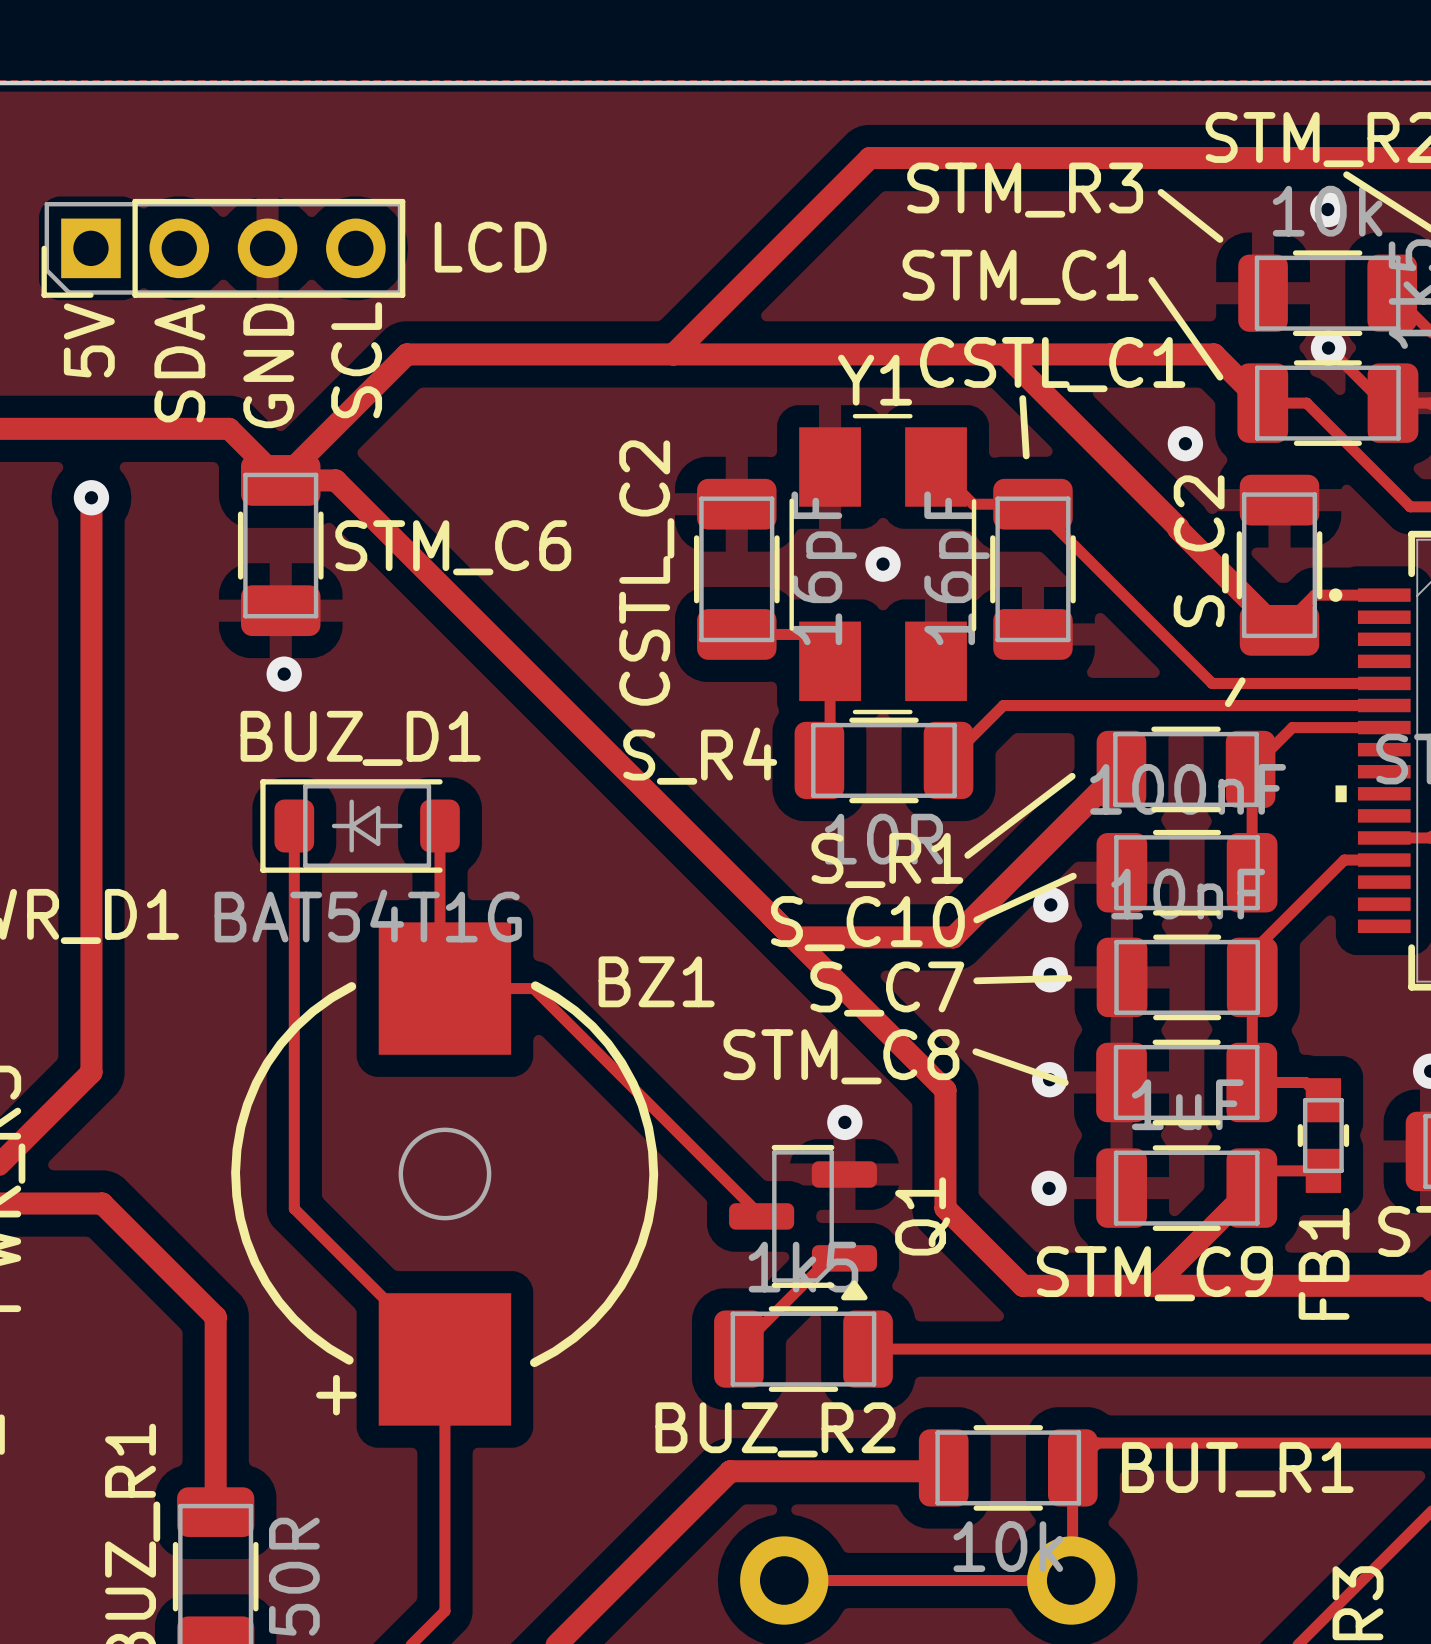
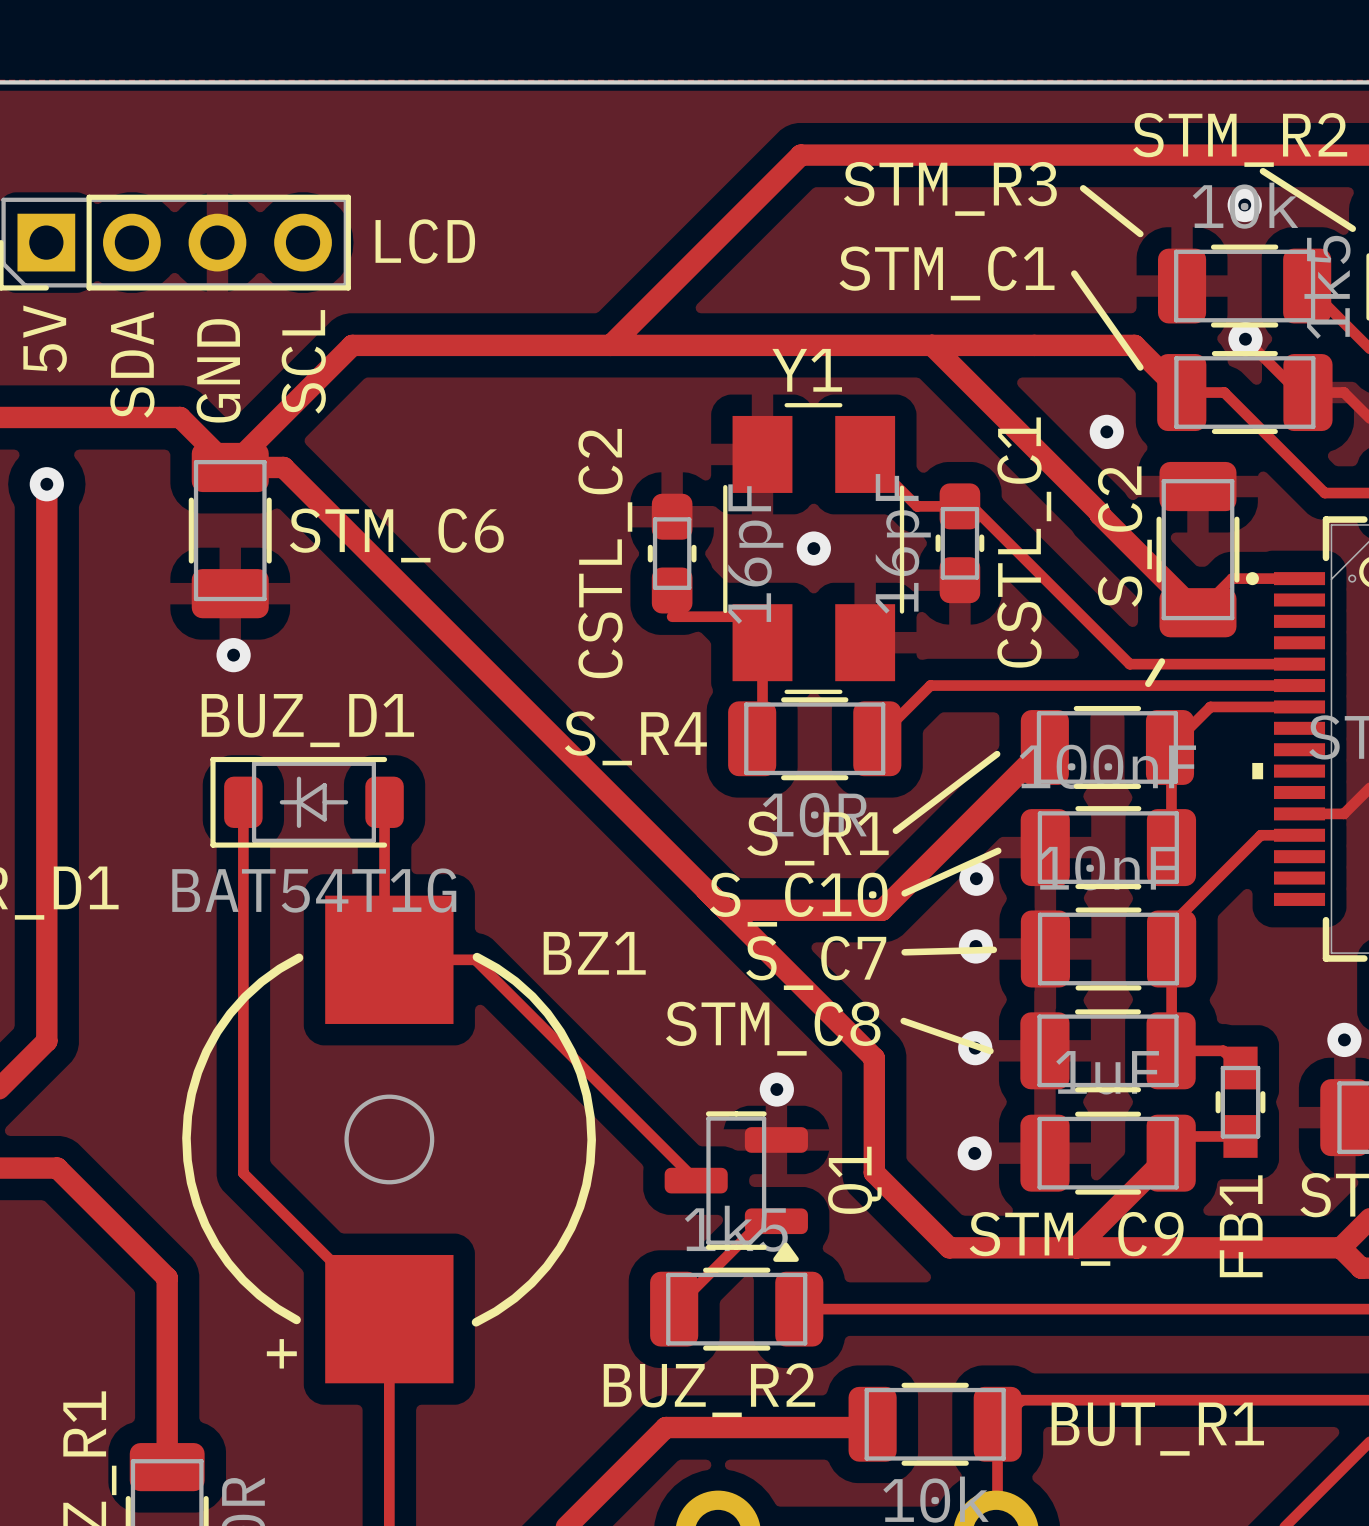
CSTL_C1 name position: CSTL_C1 (1052, 364) -> CSTL_C1 (1024, 542)
line: (1022, 398) (1026, 455) -> none
CSTL_C2 footprint: [693, 478, 780, 660] -> [647, 493, 697, 614]
CSTL_C1 footprint: [990, 478, 1076, 660] -> [935, 483, 985, 604]
track: (973, 504) (1032, 504) (1212, 683) -> (901, 490) (917, 506) (972, 506) (1129, 664) (1132, 664)
CSTL_C2 name position: CSTL_C2 (646, 573) -> CSTL_C2 (605, 553)

